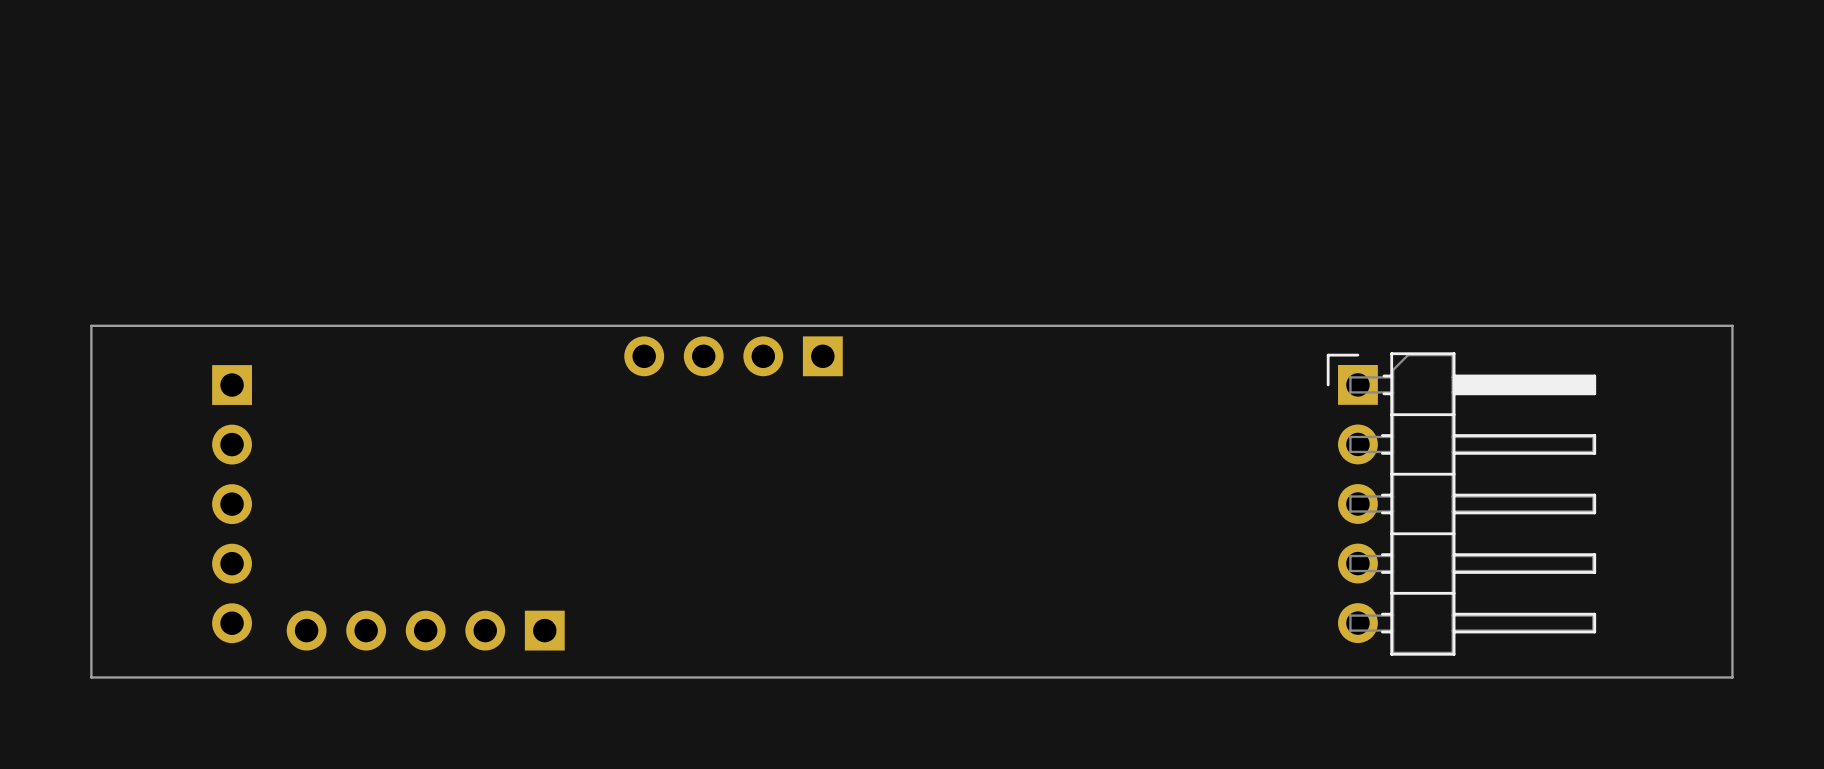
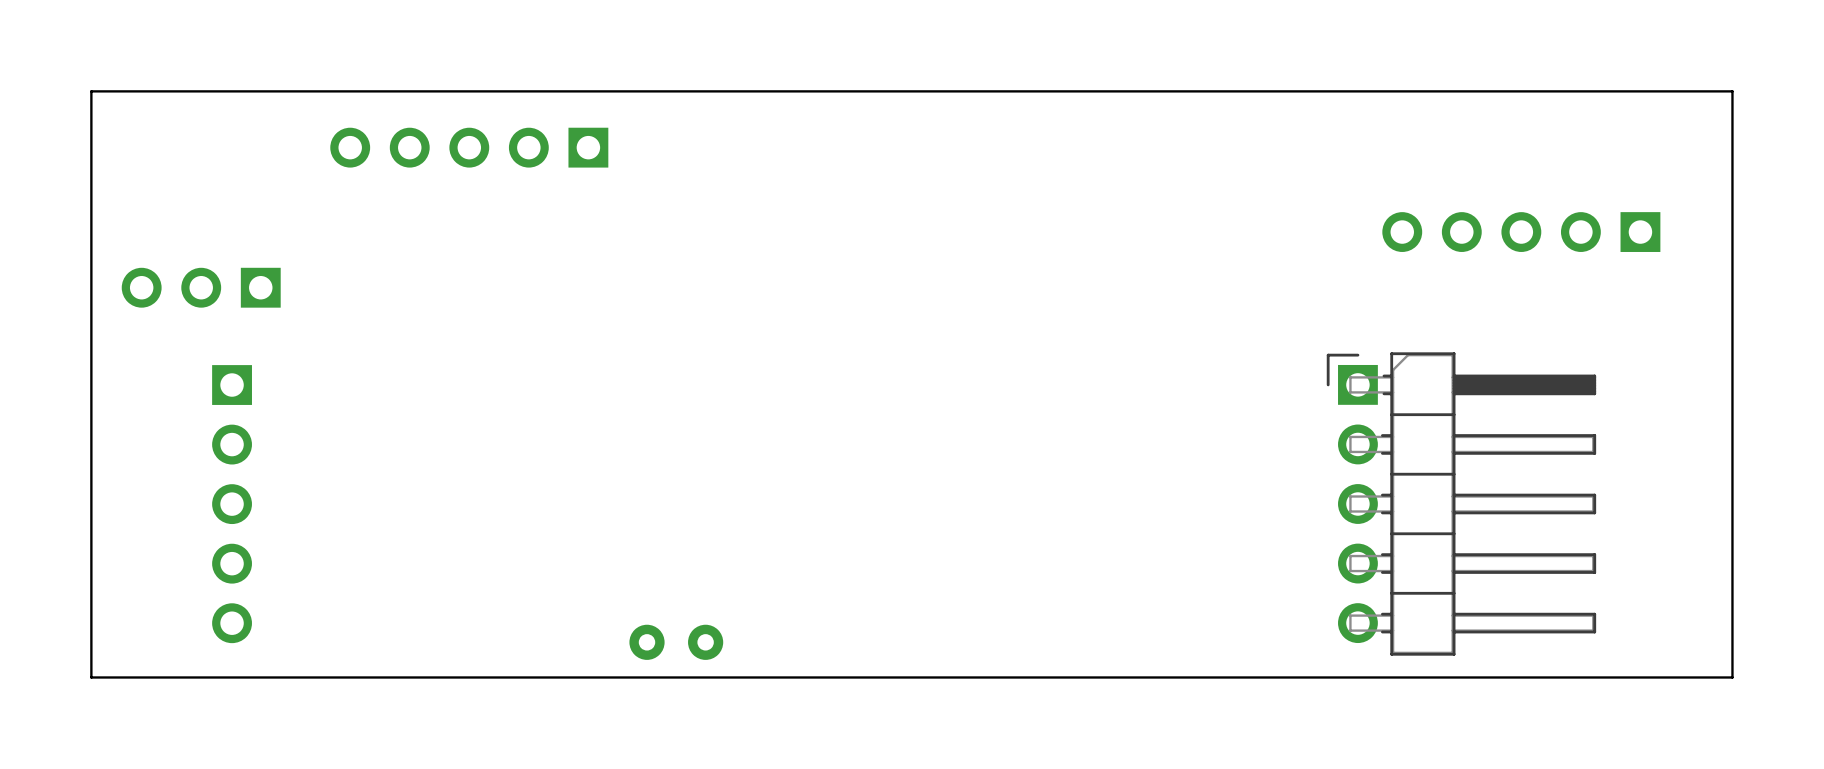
part: none -> (1521, 232)
part: none -> (201, 287)
board edge: (1732, 325) (91, 325) -> (1732, 325) (1732, 91) (91, 91) (91, 325)
part: (733, 356) -> none
part position: (425, 630) -> (469, 147)
part: none -> (647, 642)
part: none -> (705, 642)

